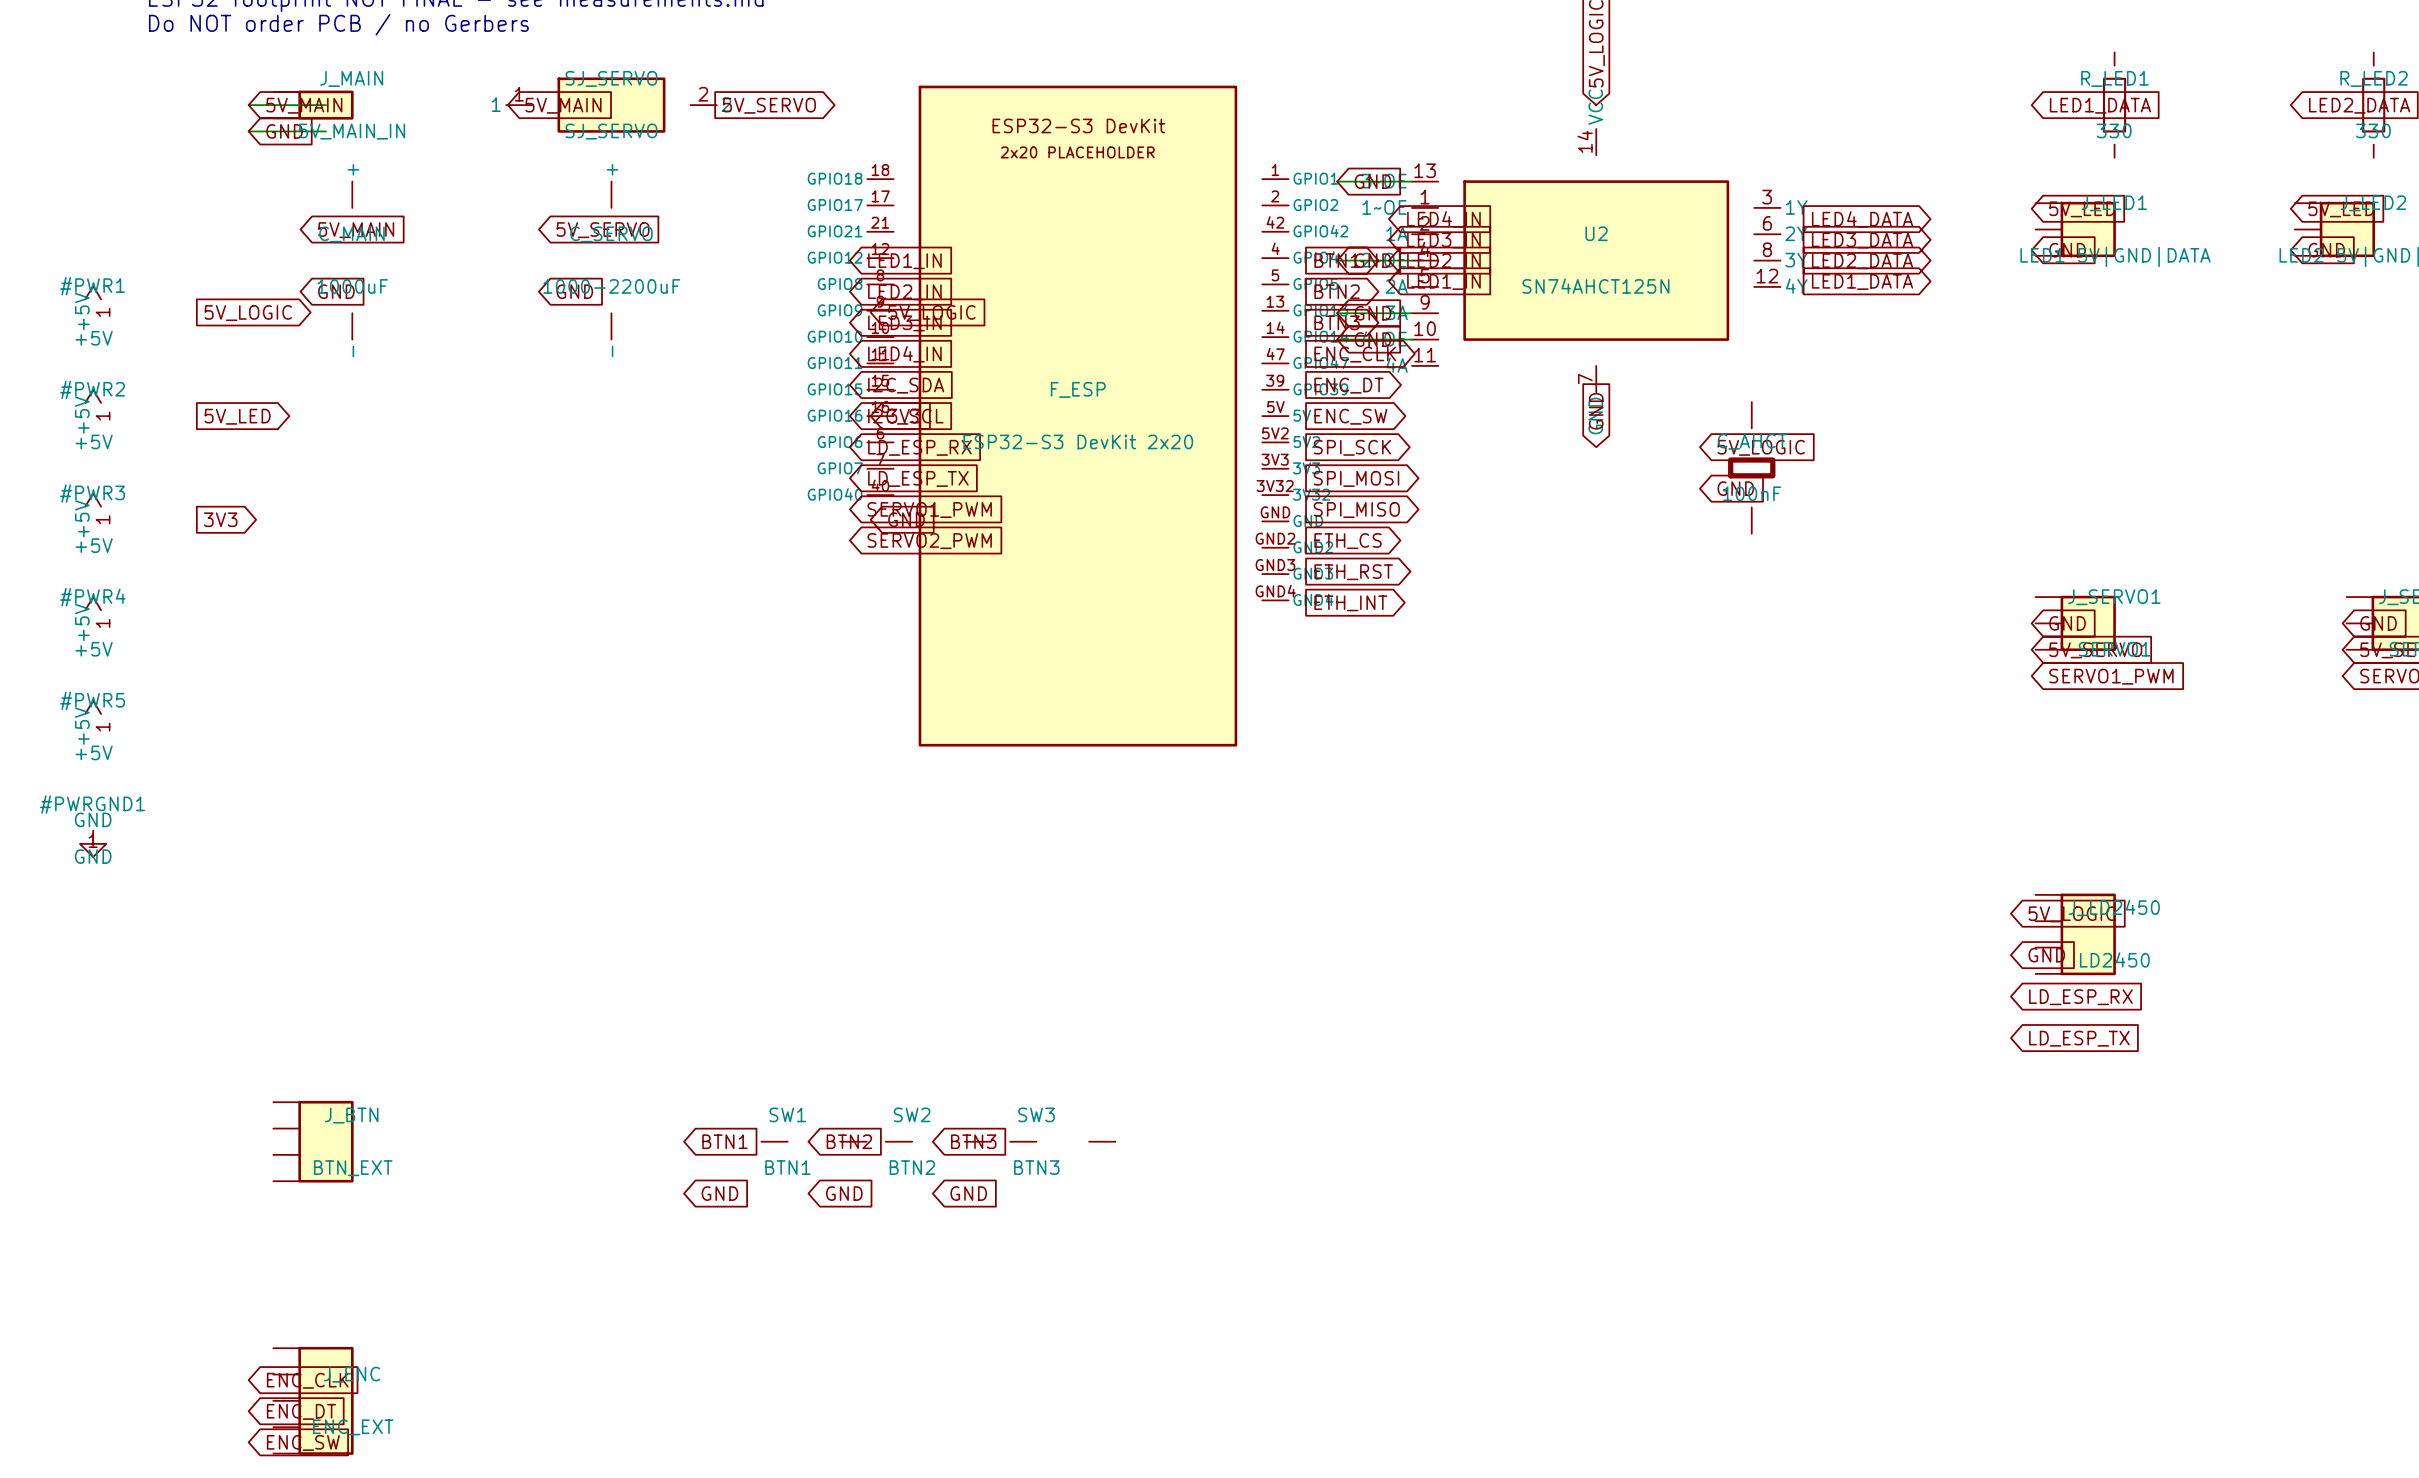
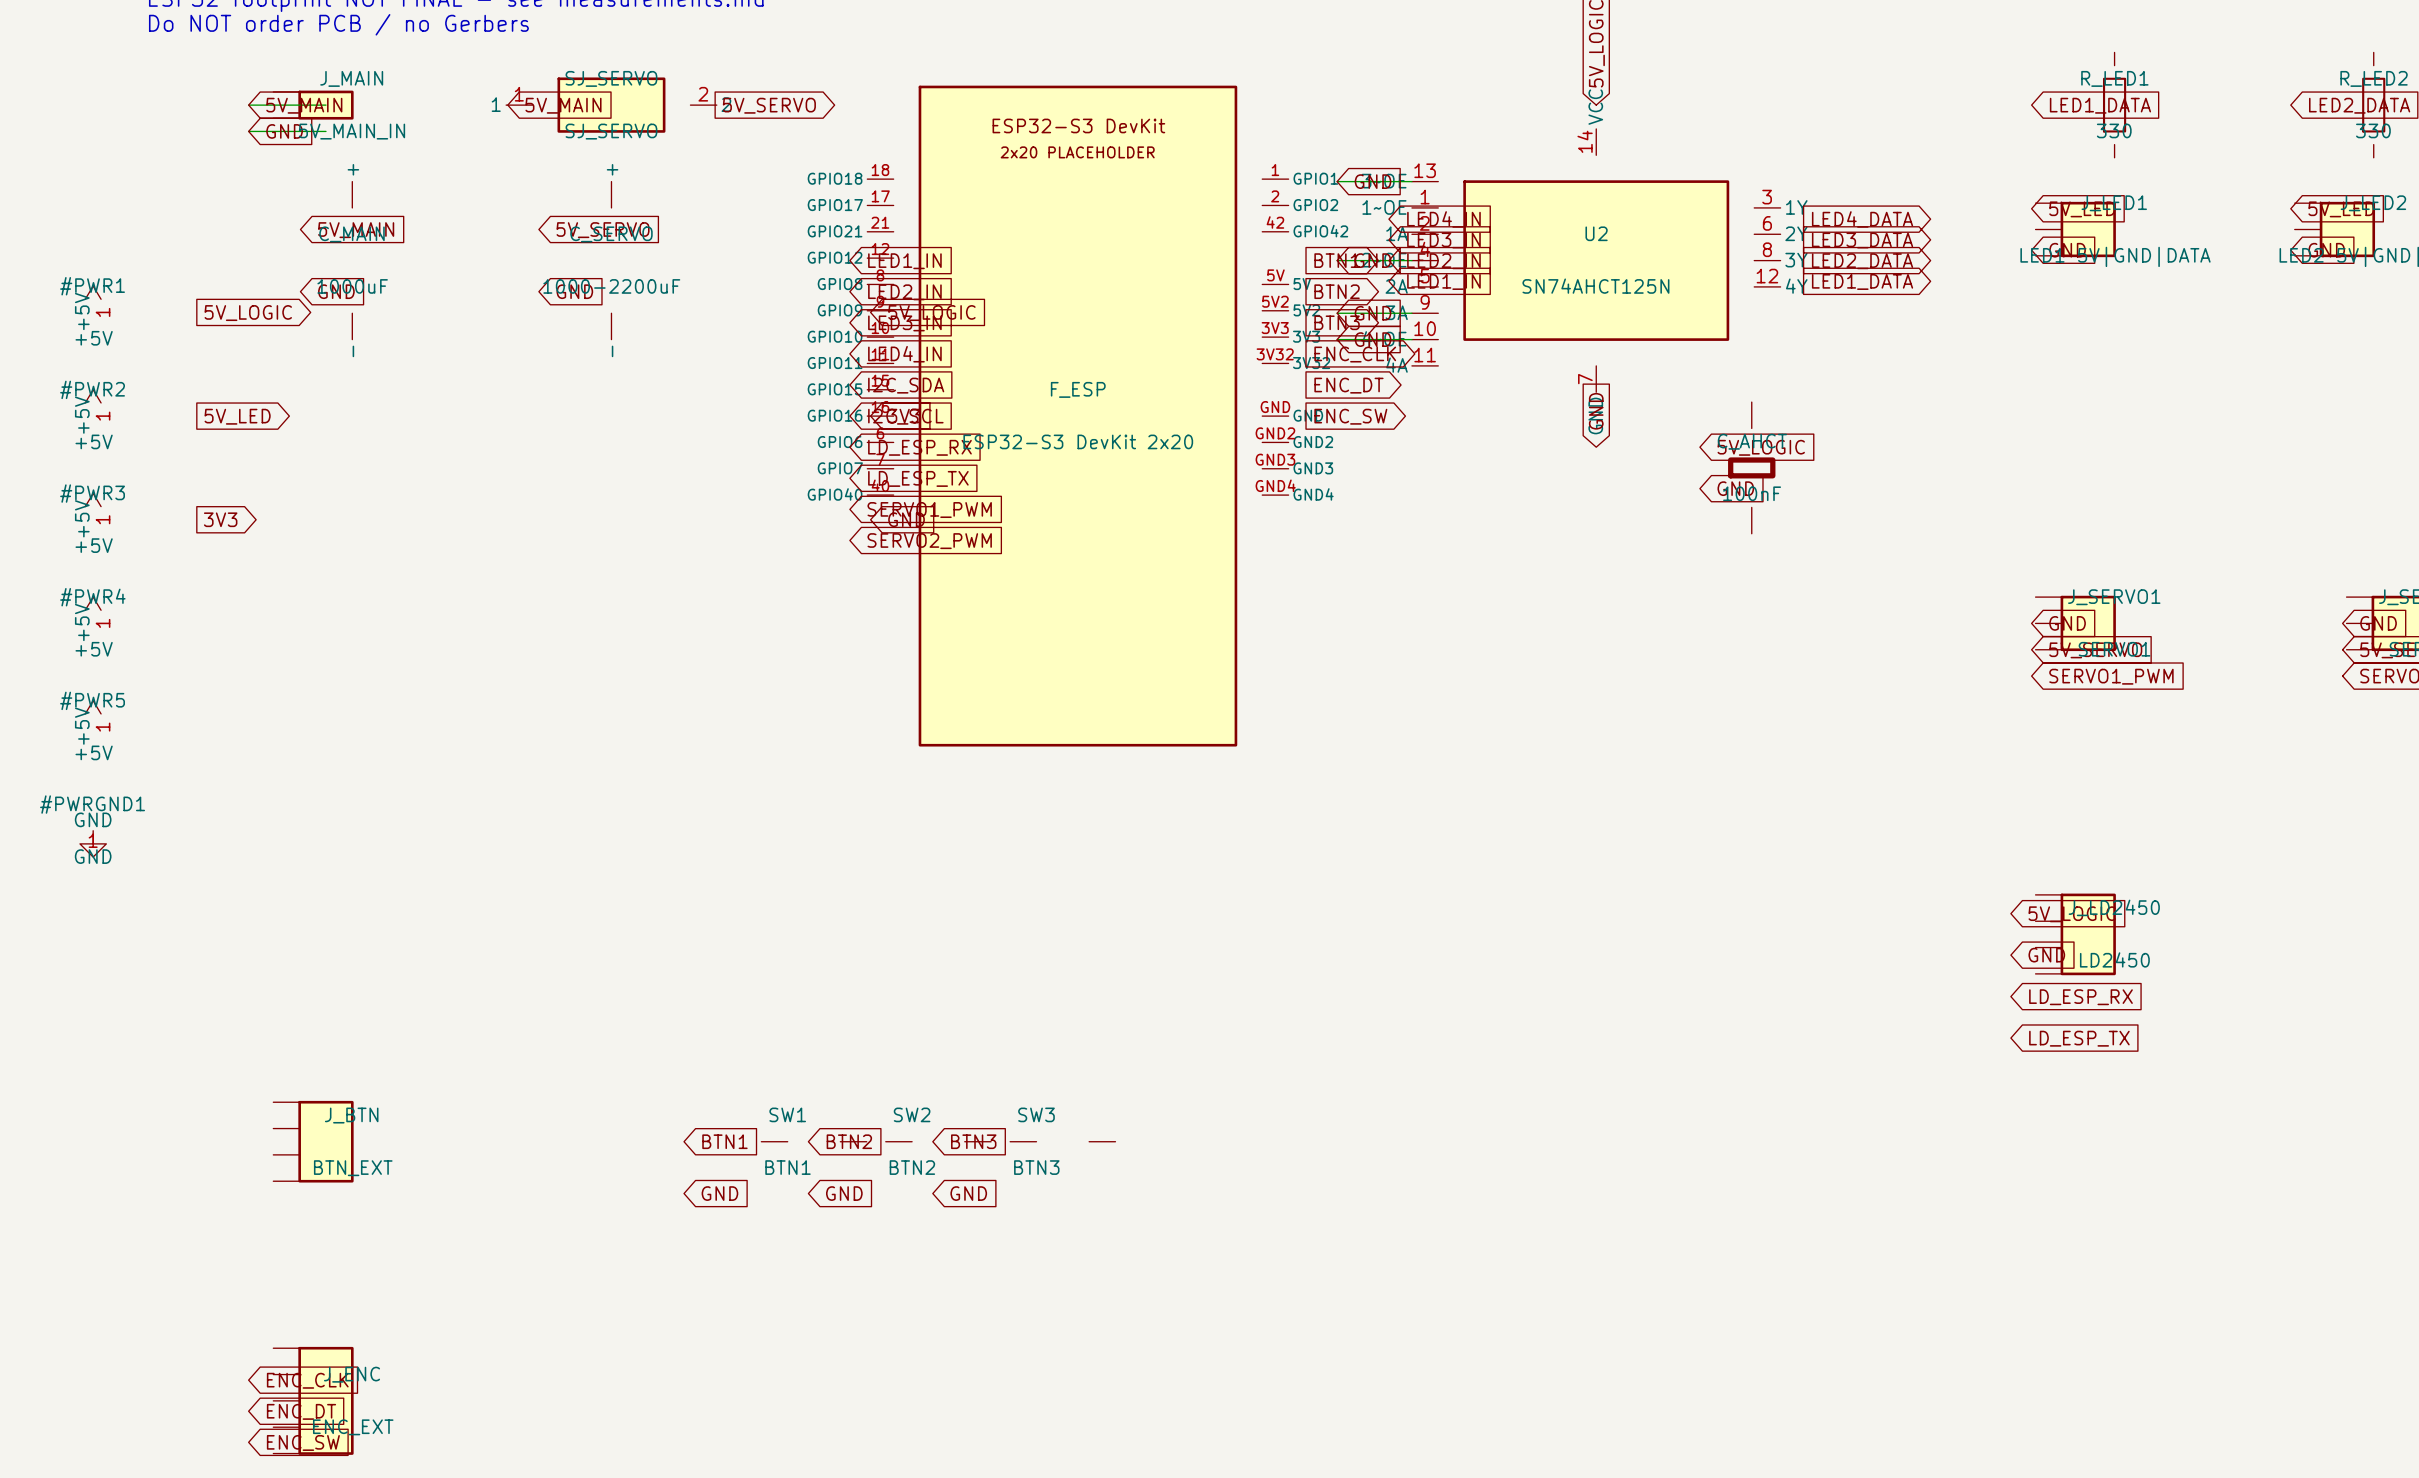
F_ESP symbol: [867, 85, 1289, 747] -> [867, 85, 1289, 747]
global label: SPI_SCK (1352, 447) -> none
global label: SPI_MOSI (1356, 478) -> none
global label: SPI_MISO (1356, 510) -> none
global label: ETH_CS (1348, 541) -> none
global label: ETH_RST (1353, 572) -> none
global label: ETH_INT (1350, 603) -> none

